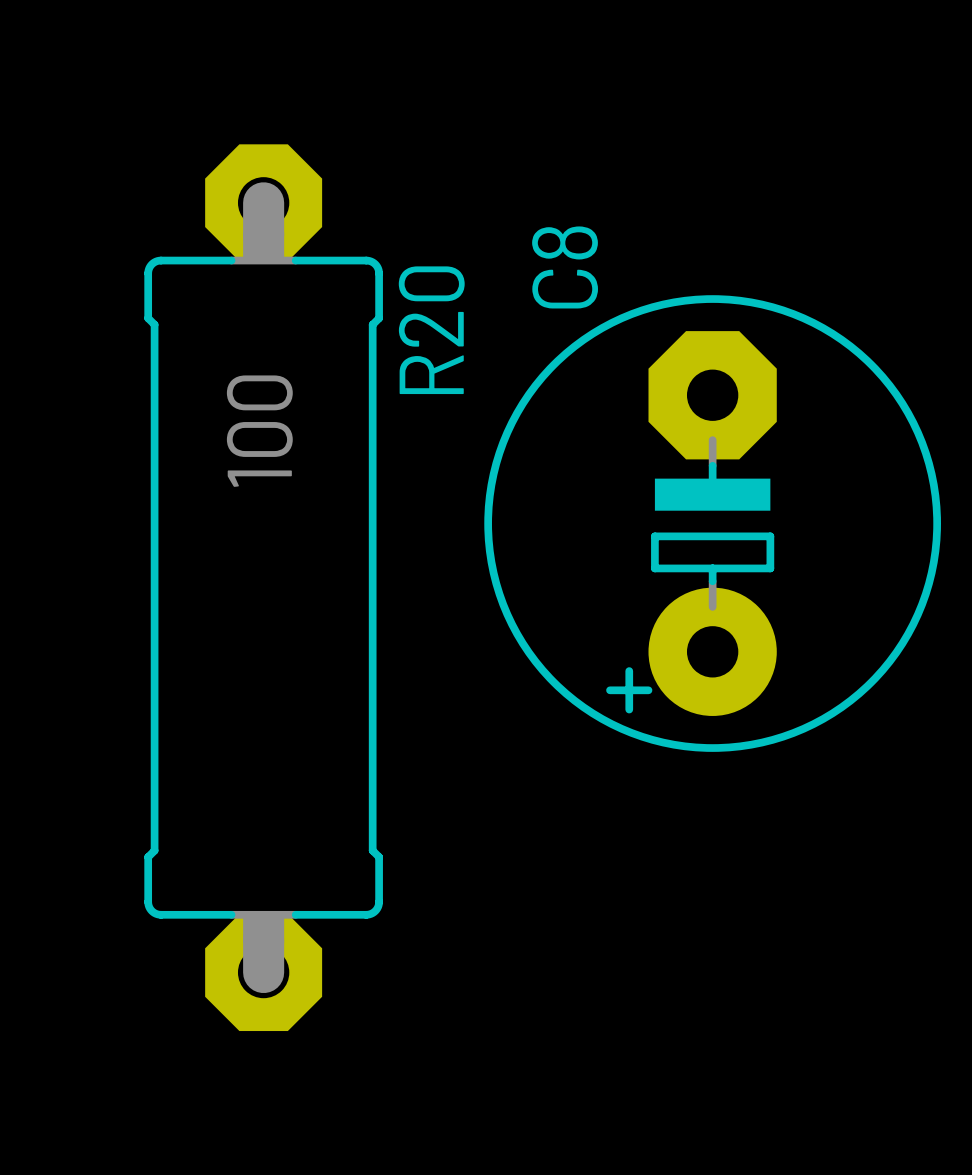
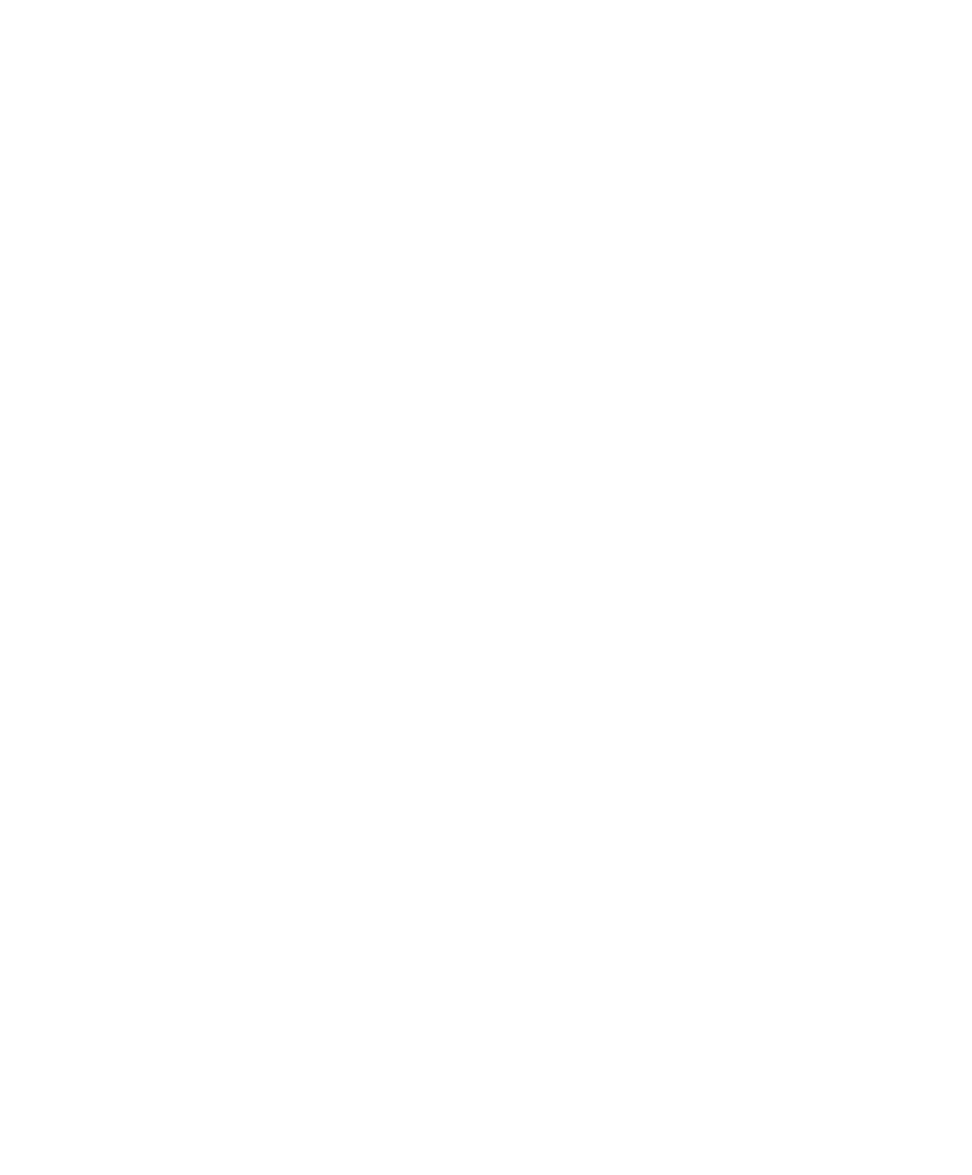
C8: (712, 523) -> none
R20: 100 (263, 587) -> none

